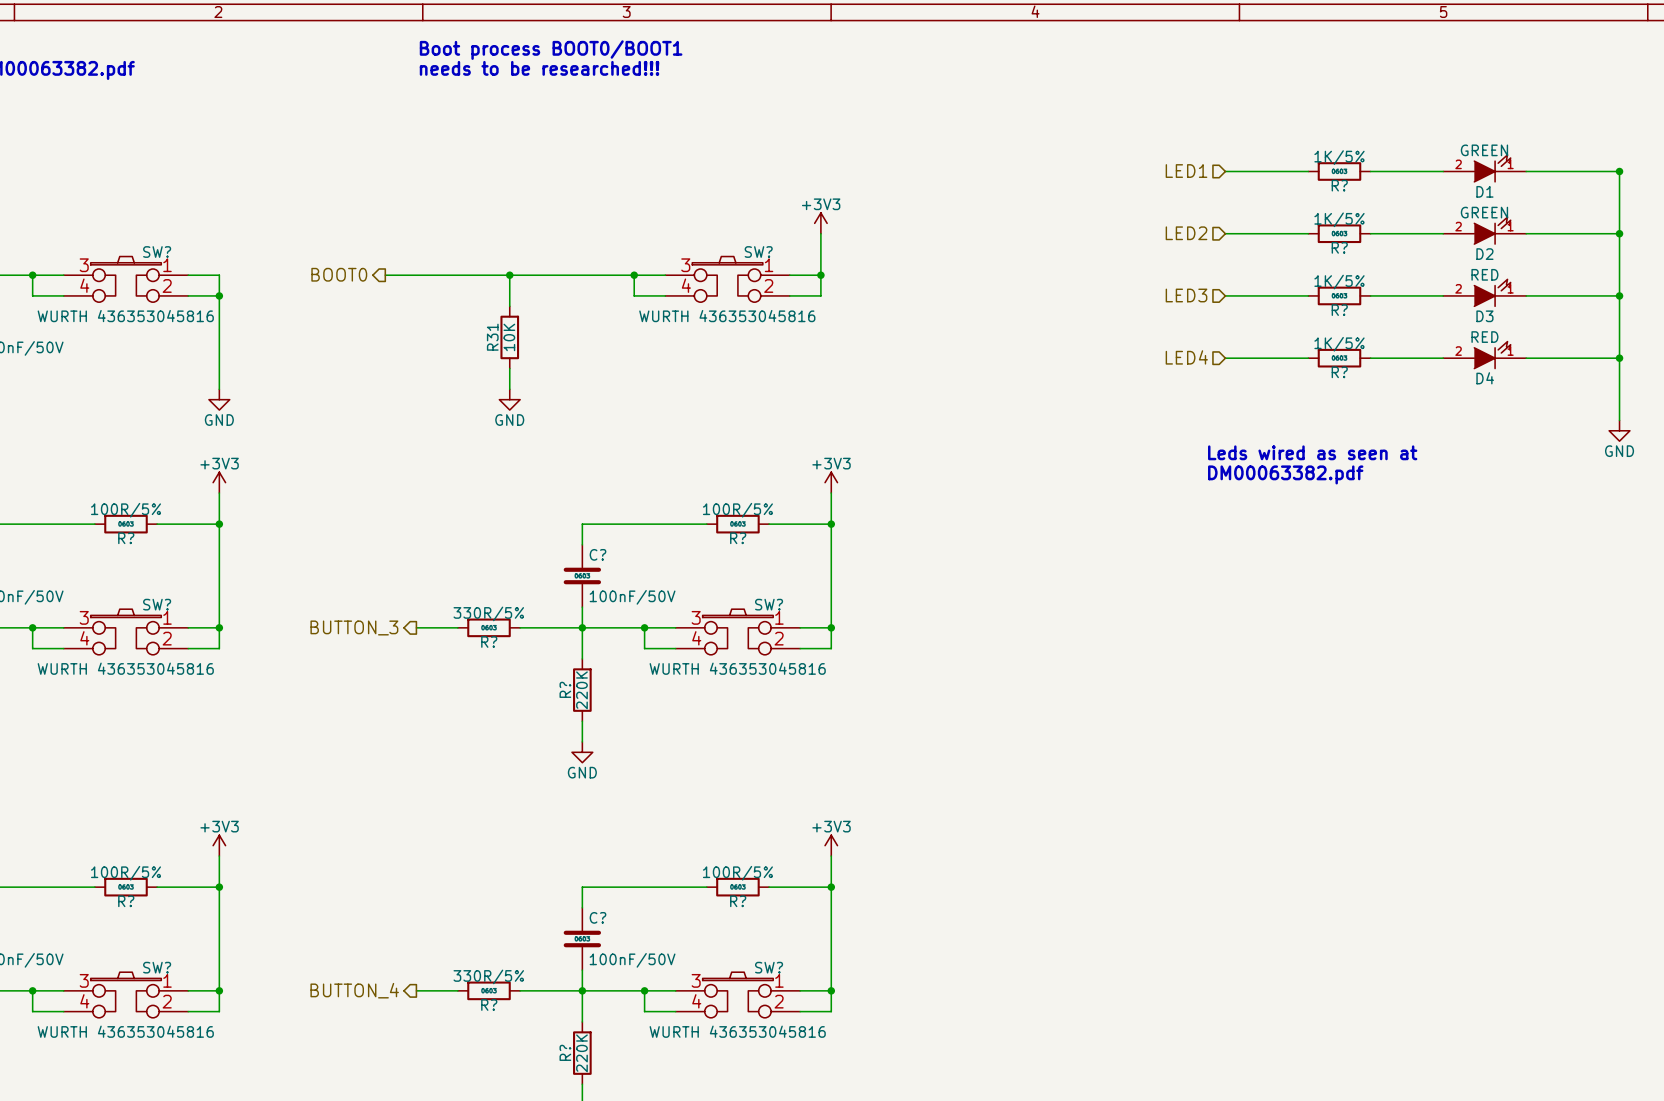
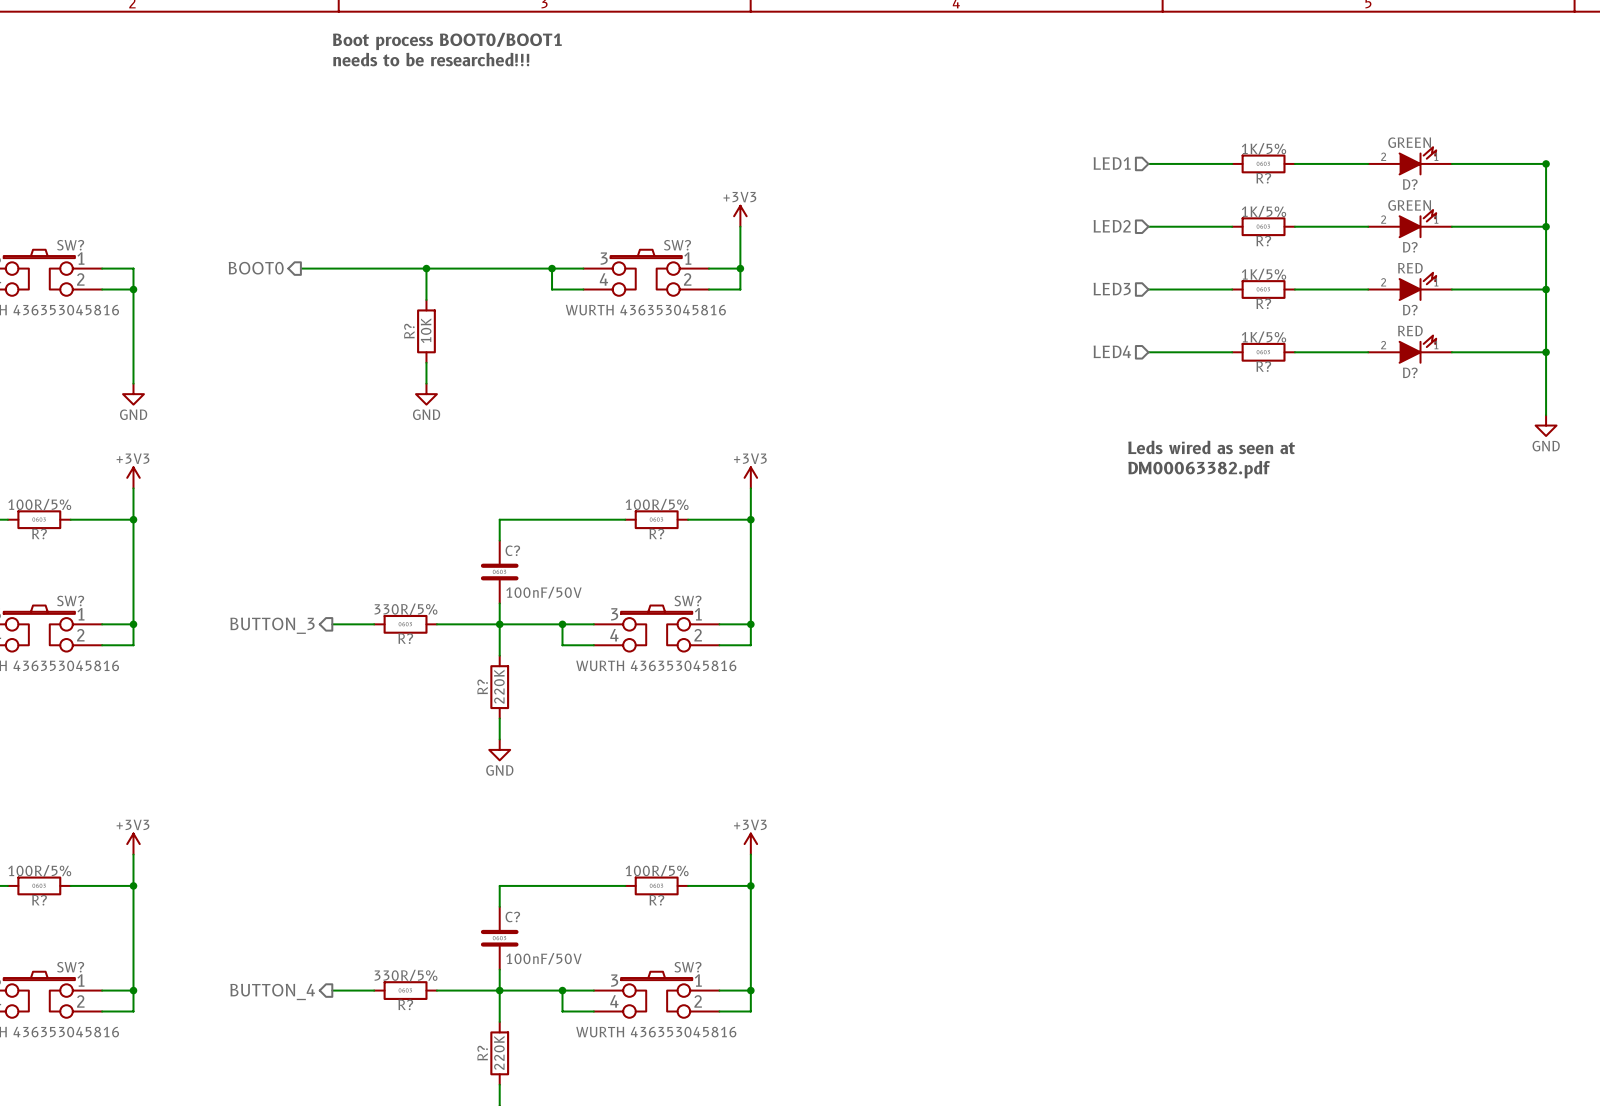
D1 name: D1 (1484, 191) -> D? (1410, 184)
D2 name: D2 (1484, 254) -> D? (1410, 247)
D3 name: D3 (1484, 316) -> D? (1410, 310)
R31 name: R31 (492, 337) -> R? (409, 331)
D4 name: D4 (1485, 378) -> D? (1410, 372)

